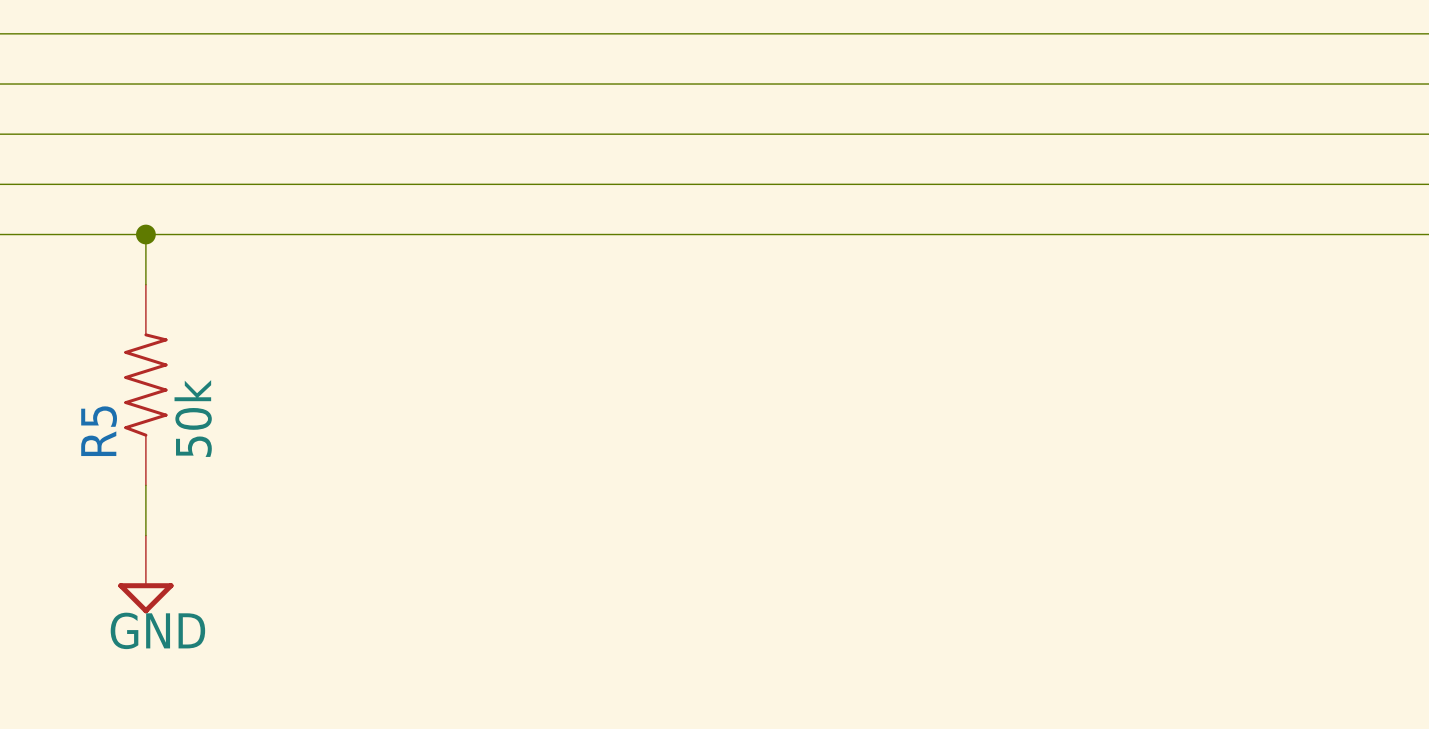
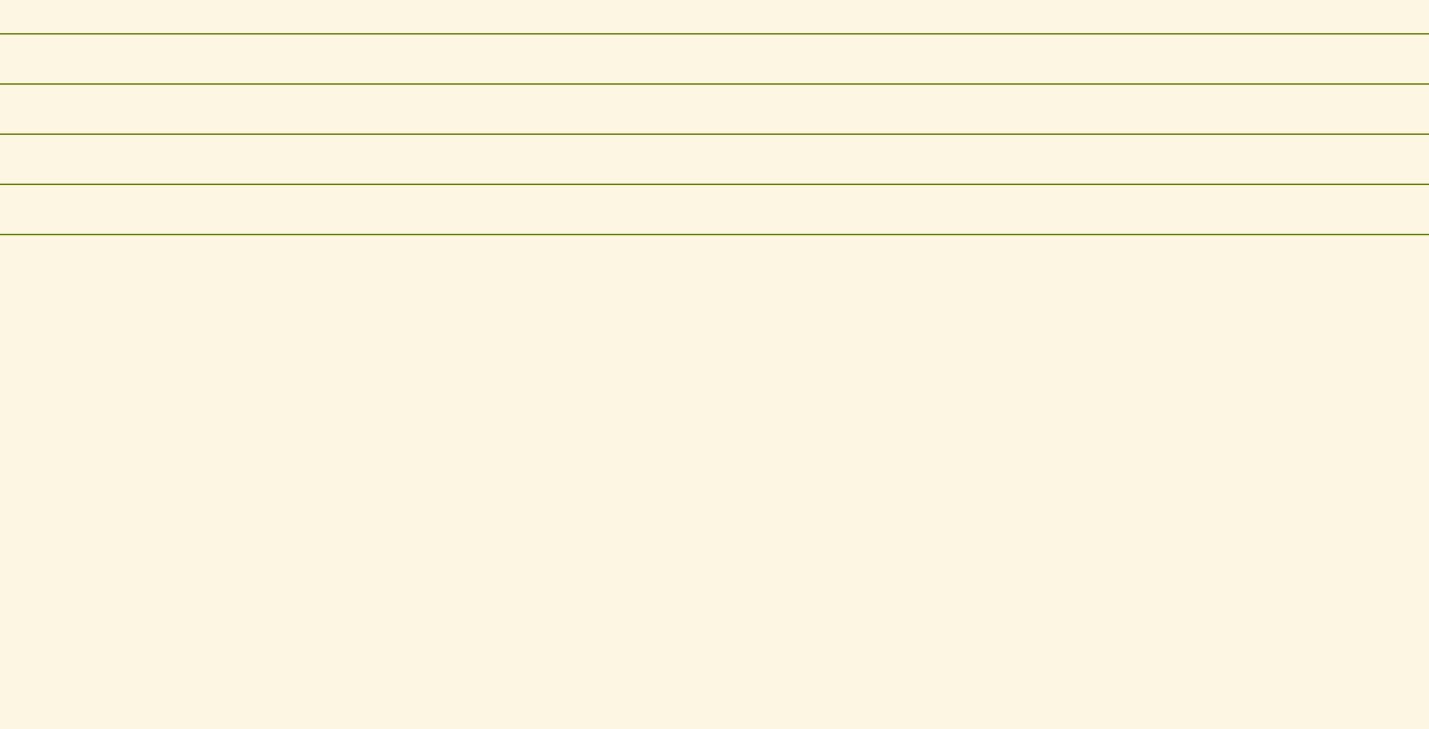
wire: (145, 234) (145, 284) -> none
junction: (145, 234) -> none
R5: 50k (145, 385) -> none
wire: (145, 485) (145, 535) -> none
power symbol: GND (145, 574) -> none

